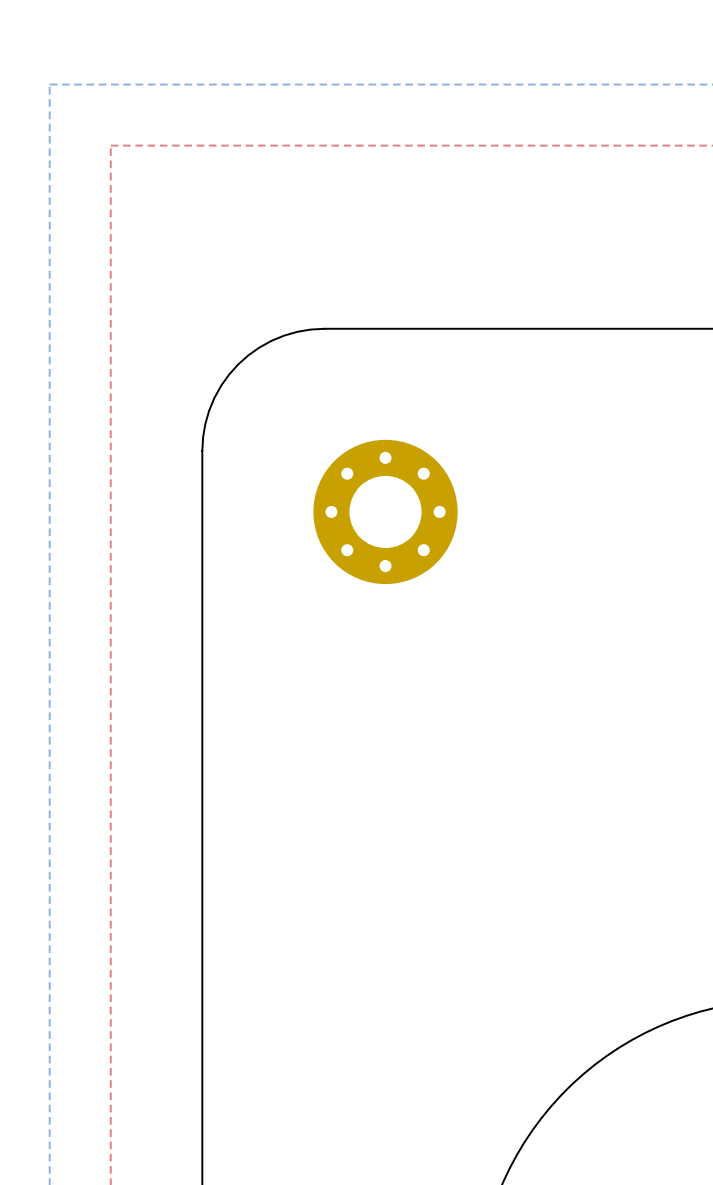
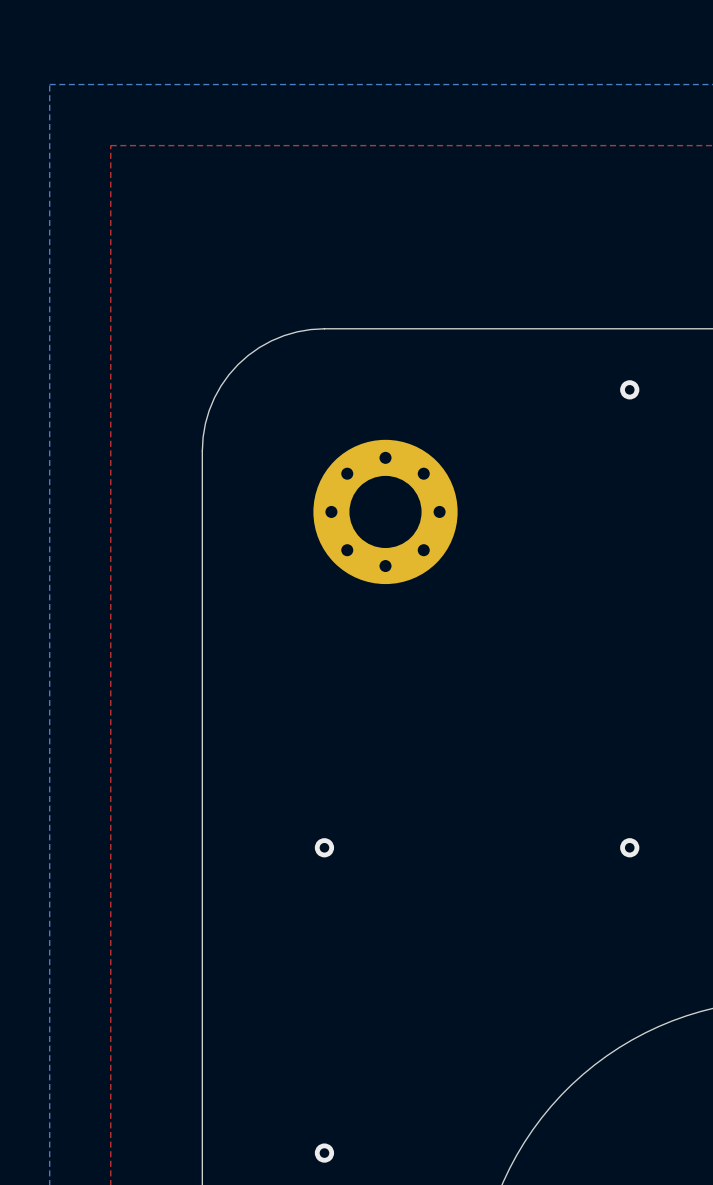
via: none -> (629, 389)
via: none -> (324, 847)
via: none -> (629, 847)
via: none -> (324, 1153)

